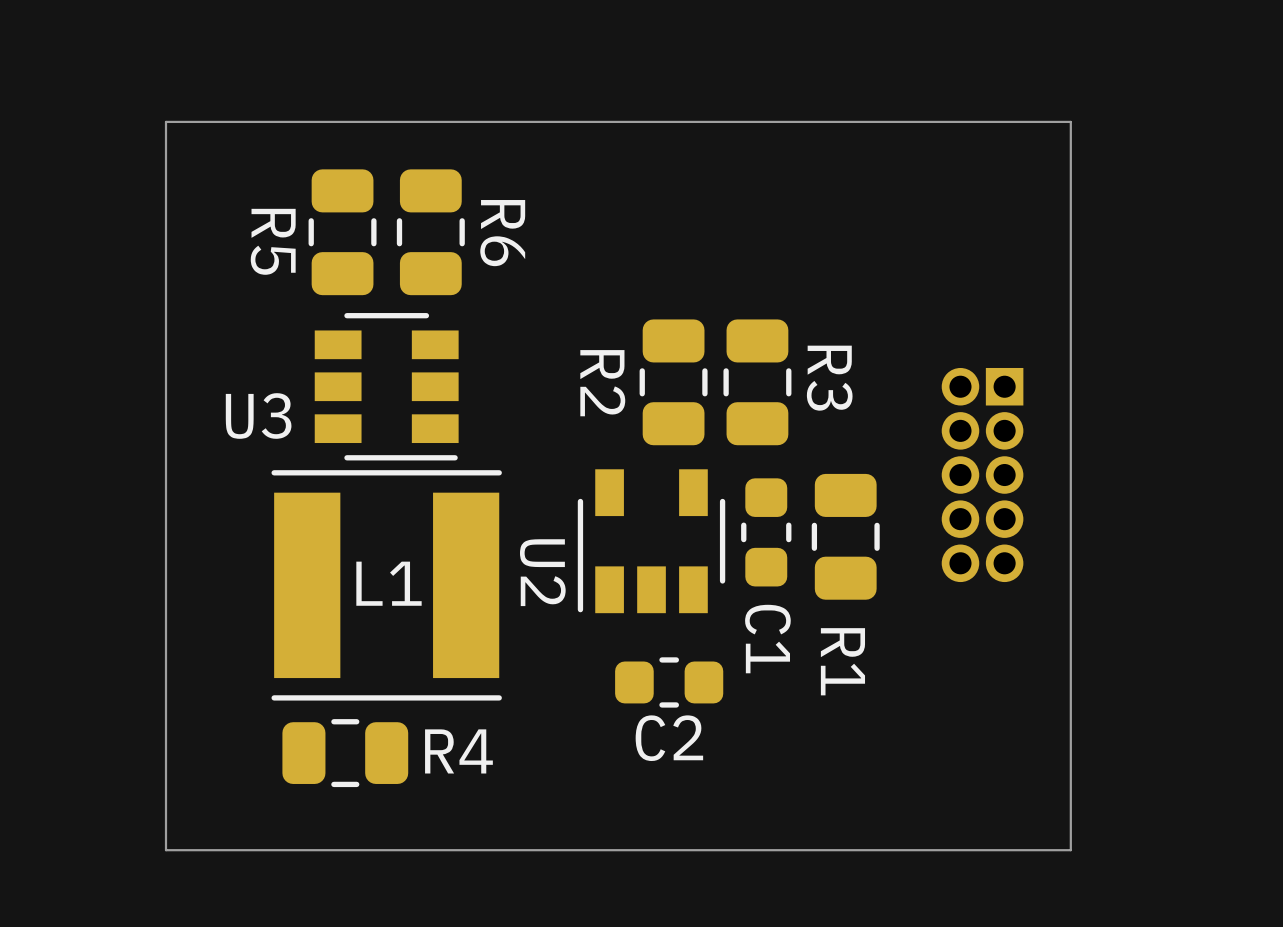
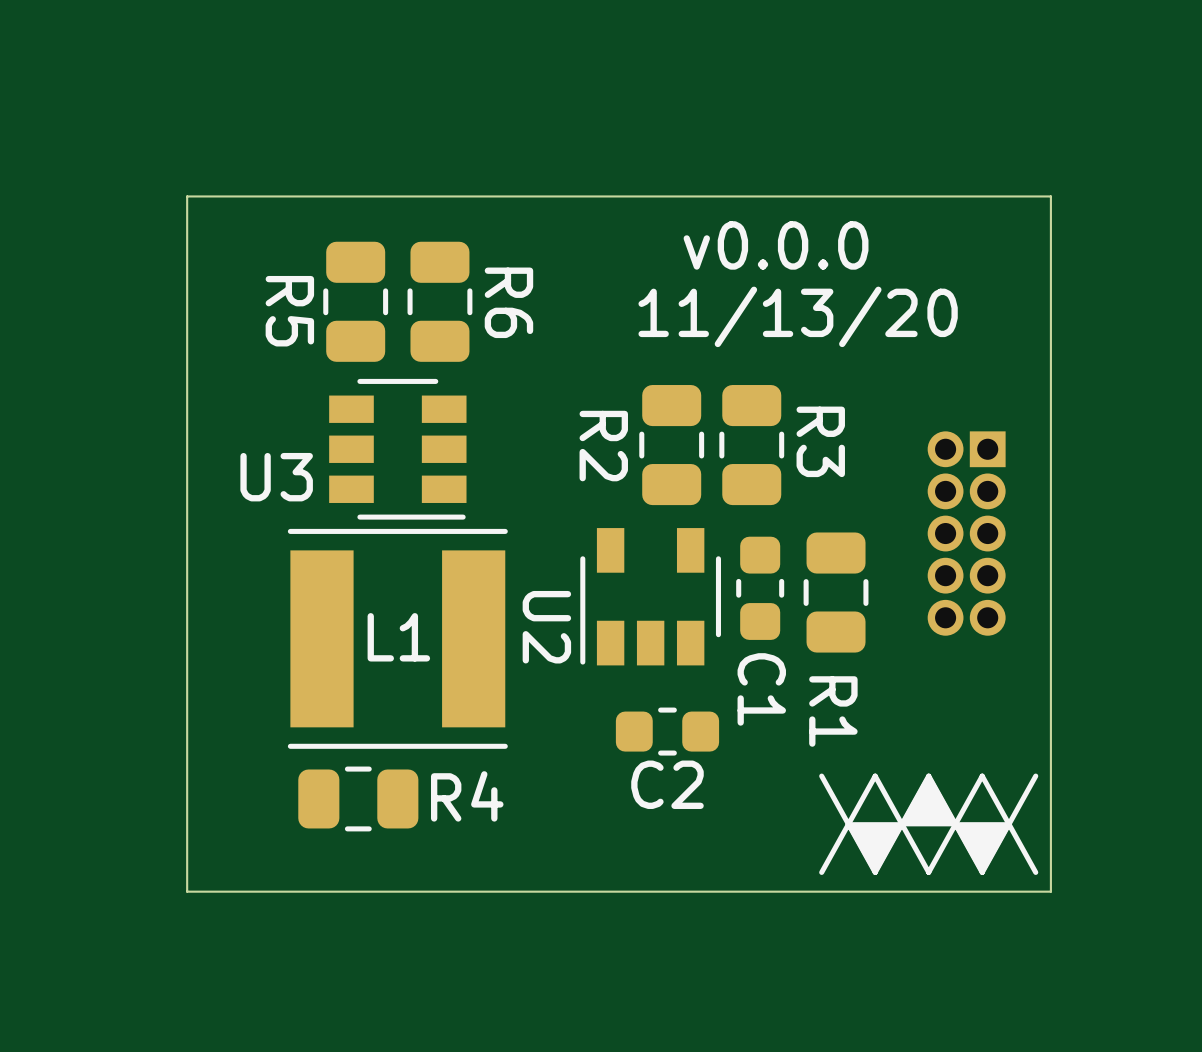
text: none -> v0.0.0 (776, 245)
text: none -> 11/13/20 (798, 316)
drawing: none -> [819, 773, 1039, 875]

